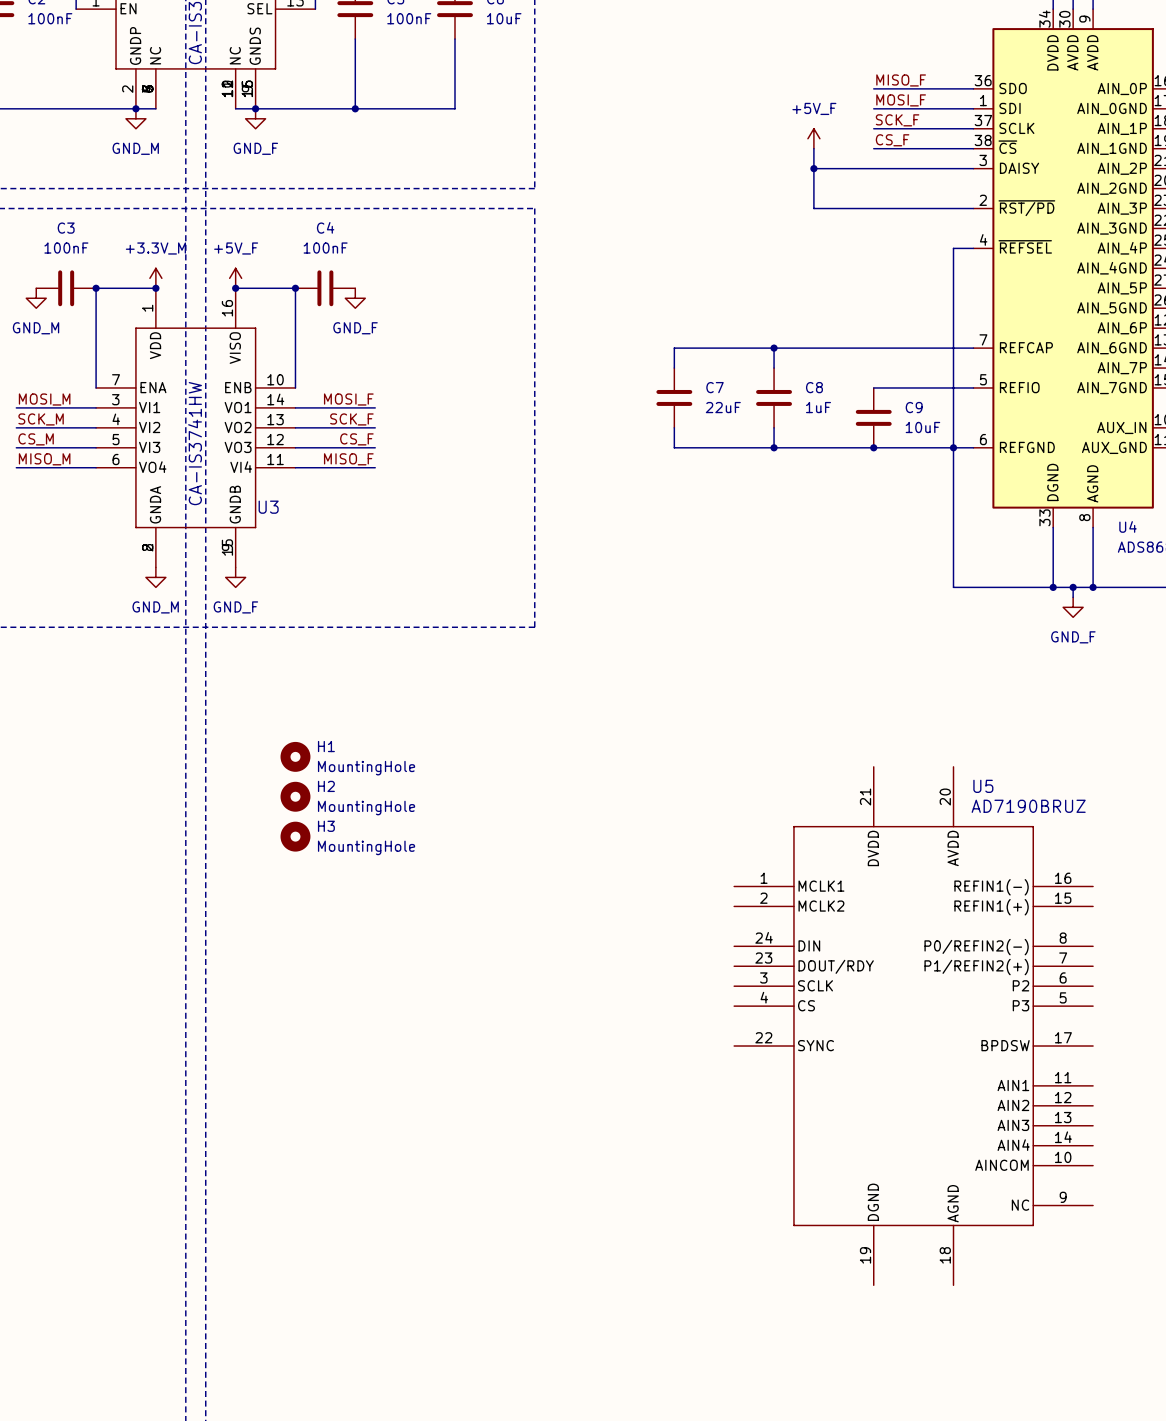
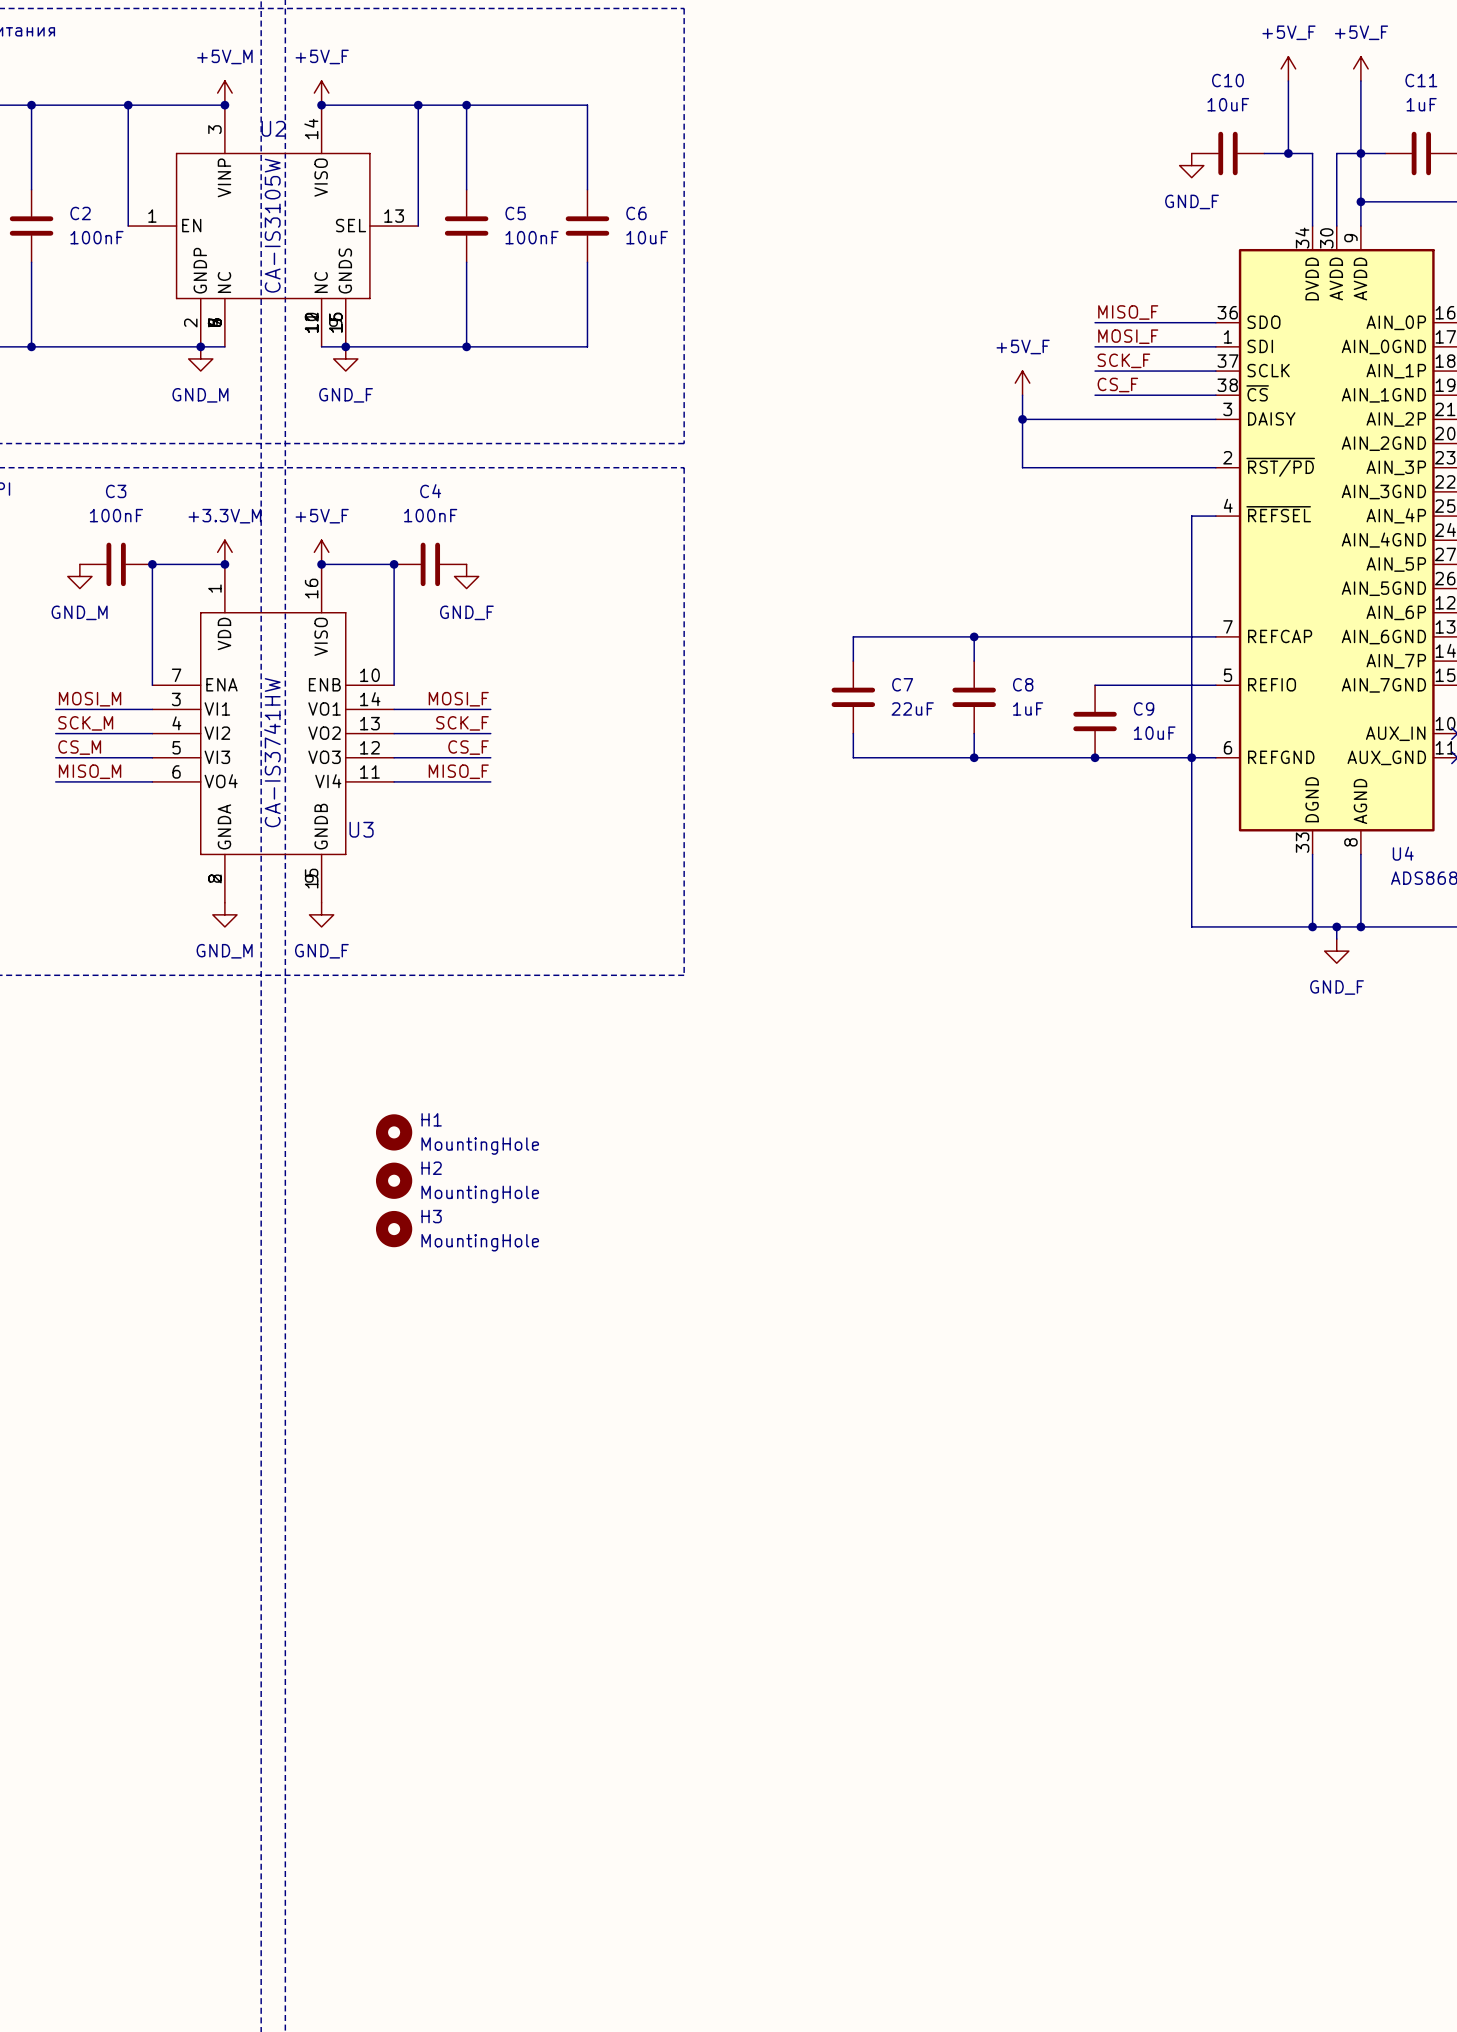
U5: AD7190BRUZ (913, 1026) -> none

